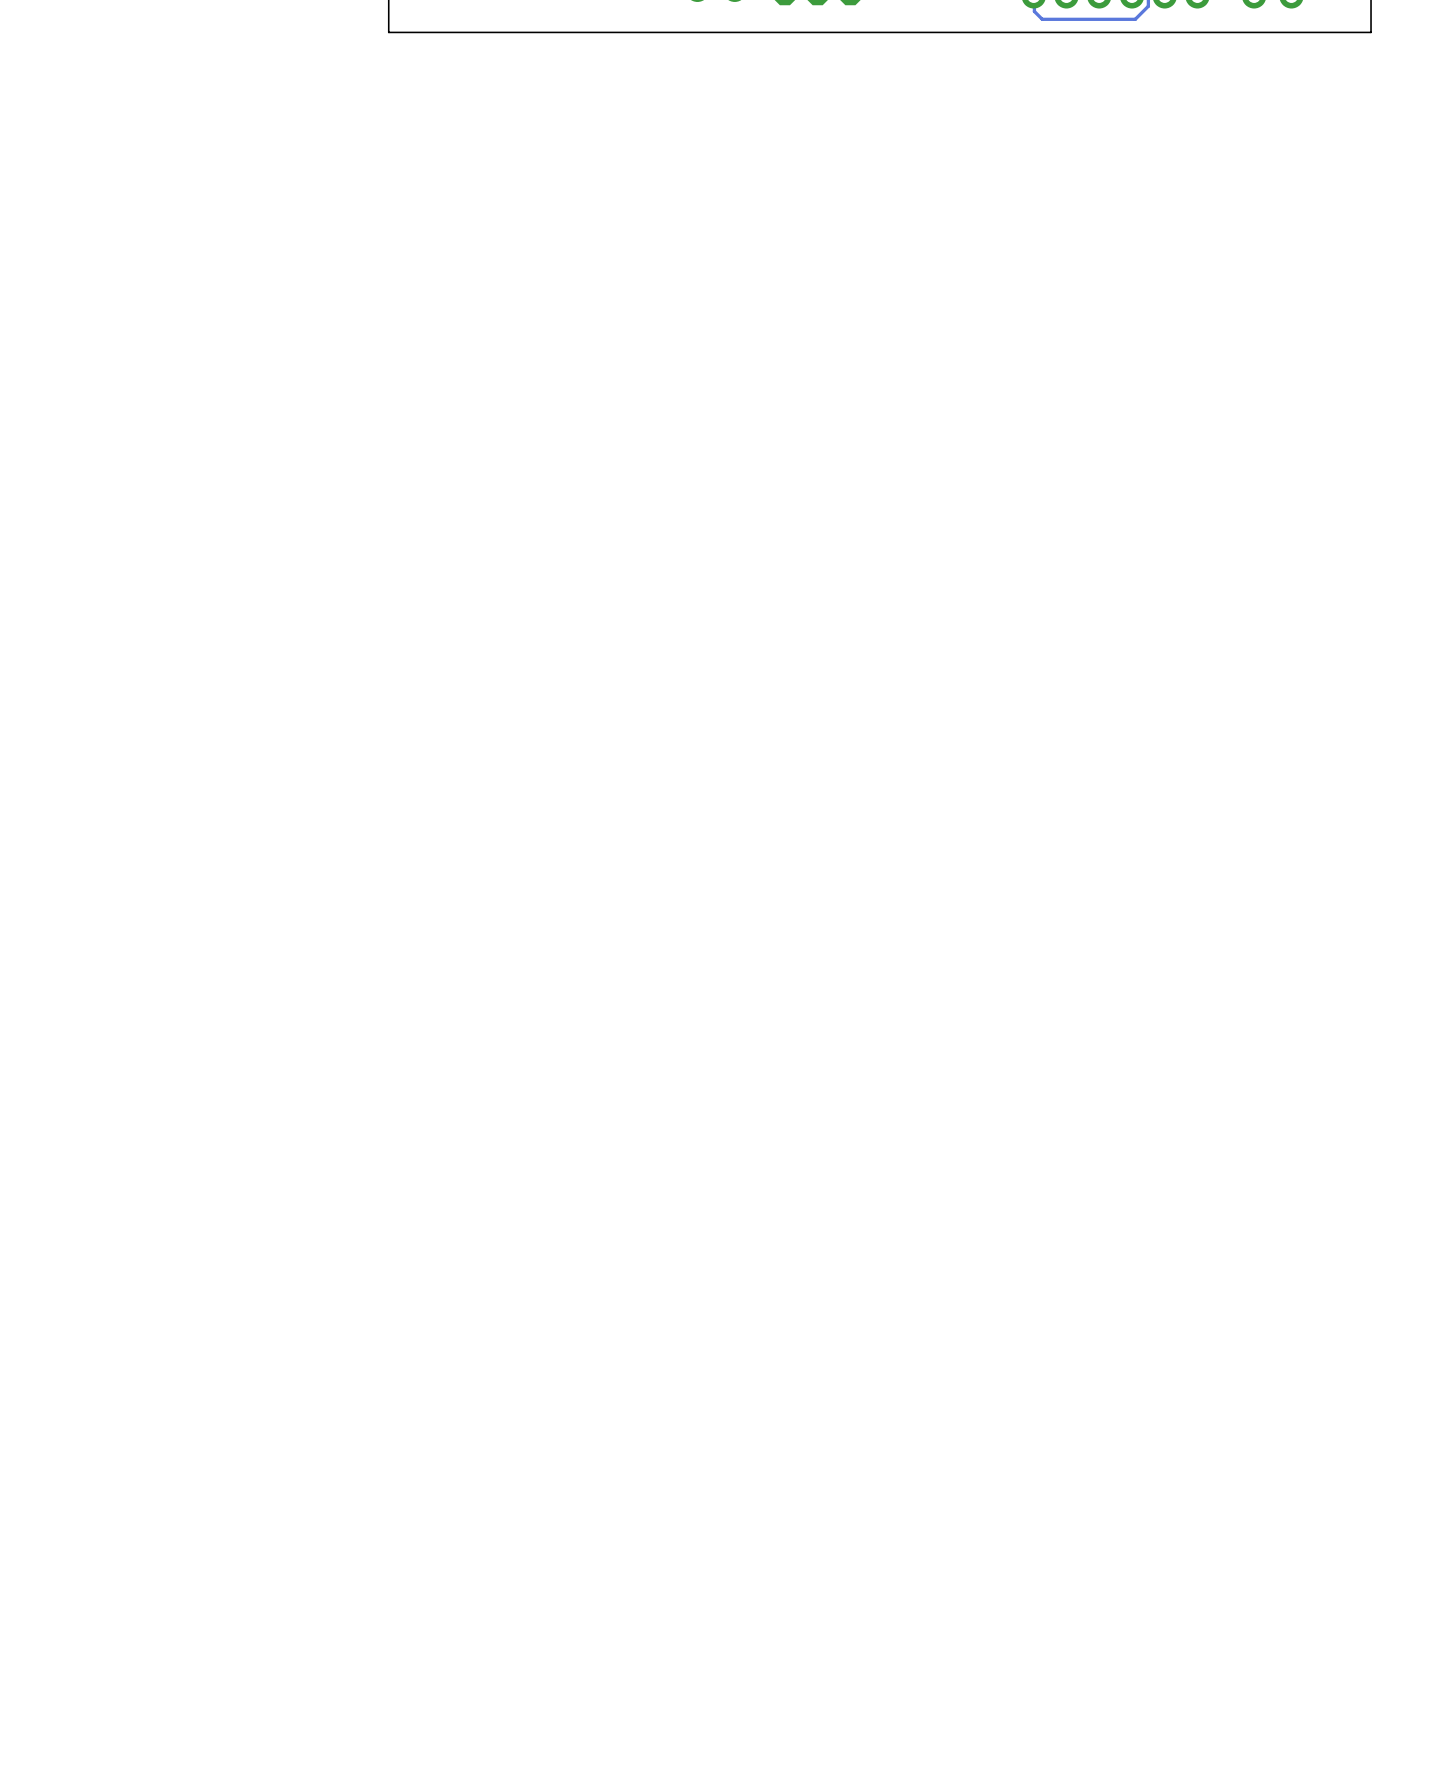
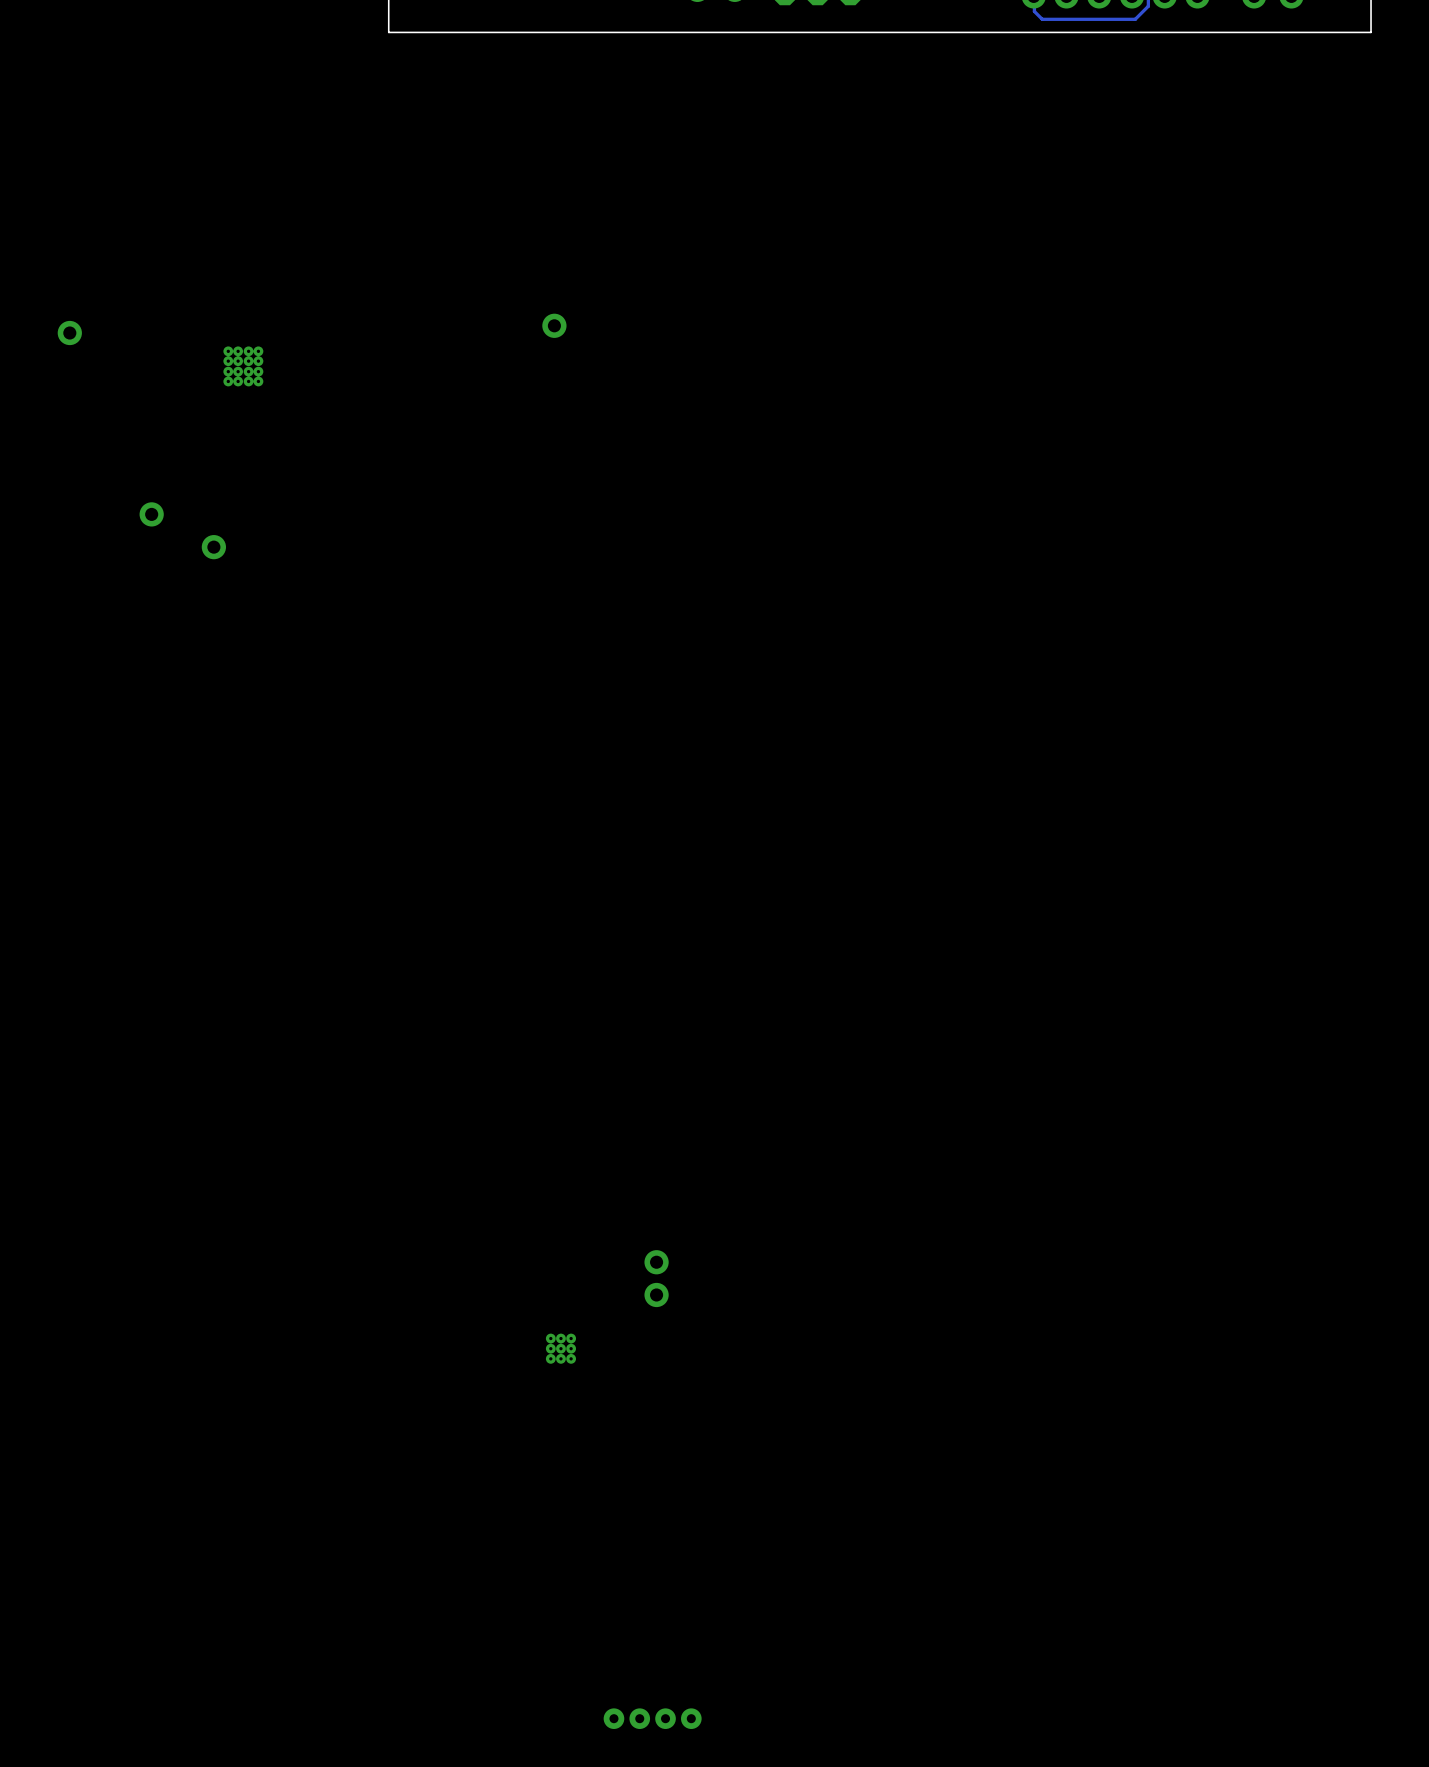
part: none -> (554, 325)
part: none -> (69, 333)
part: none -> (243, 366)
part: none -> (151, 514)
part: none -> (213, 547)
part: none -> (656, 1278)
part: none -> (560, 1348)
part: none -> (652, 1718)

